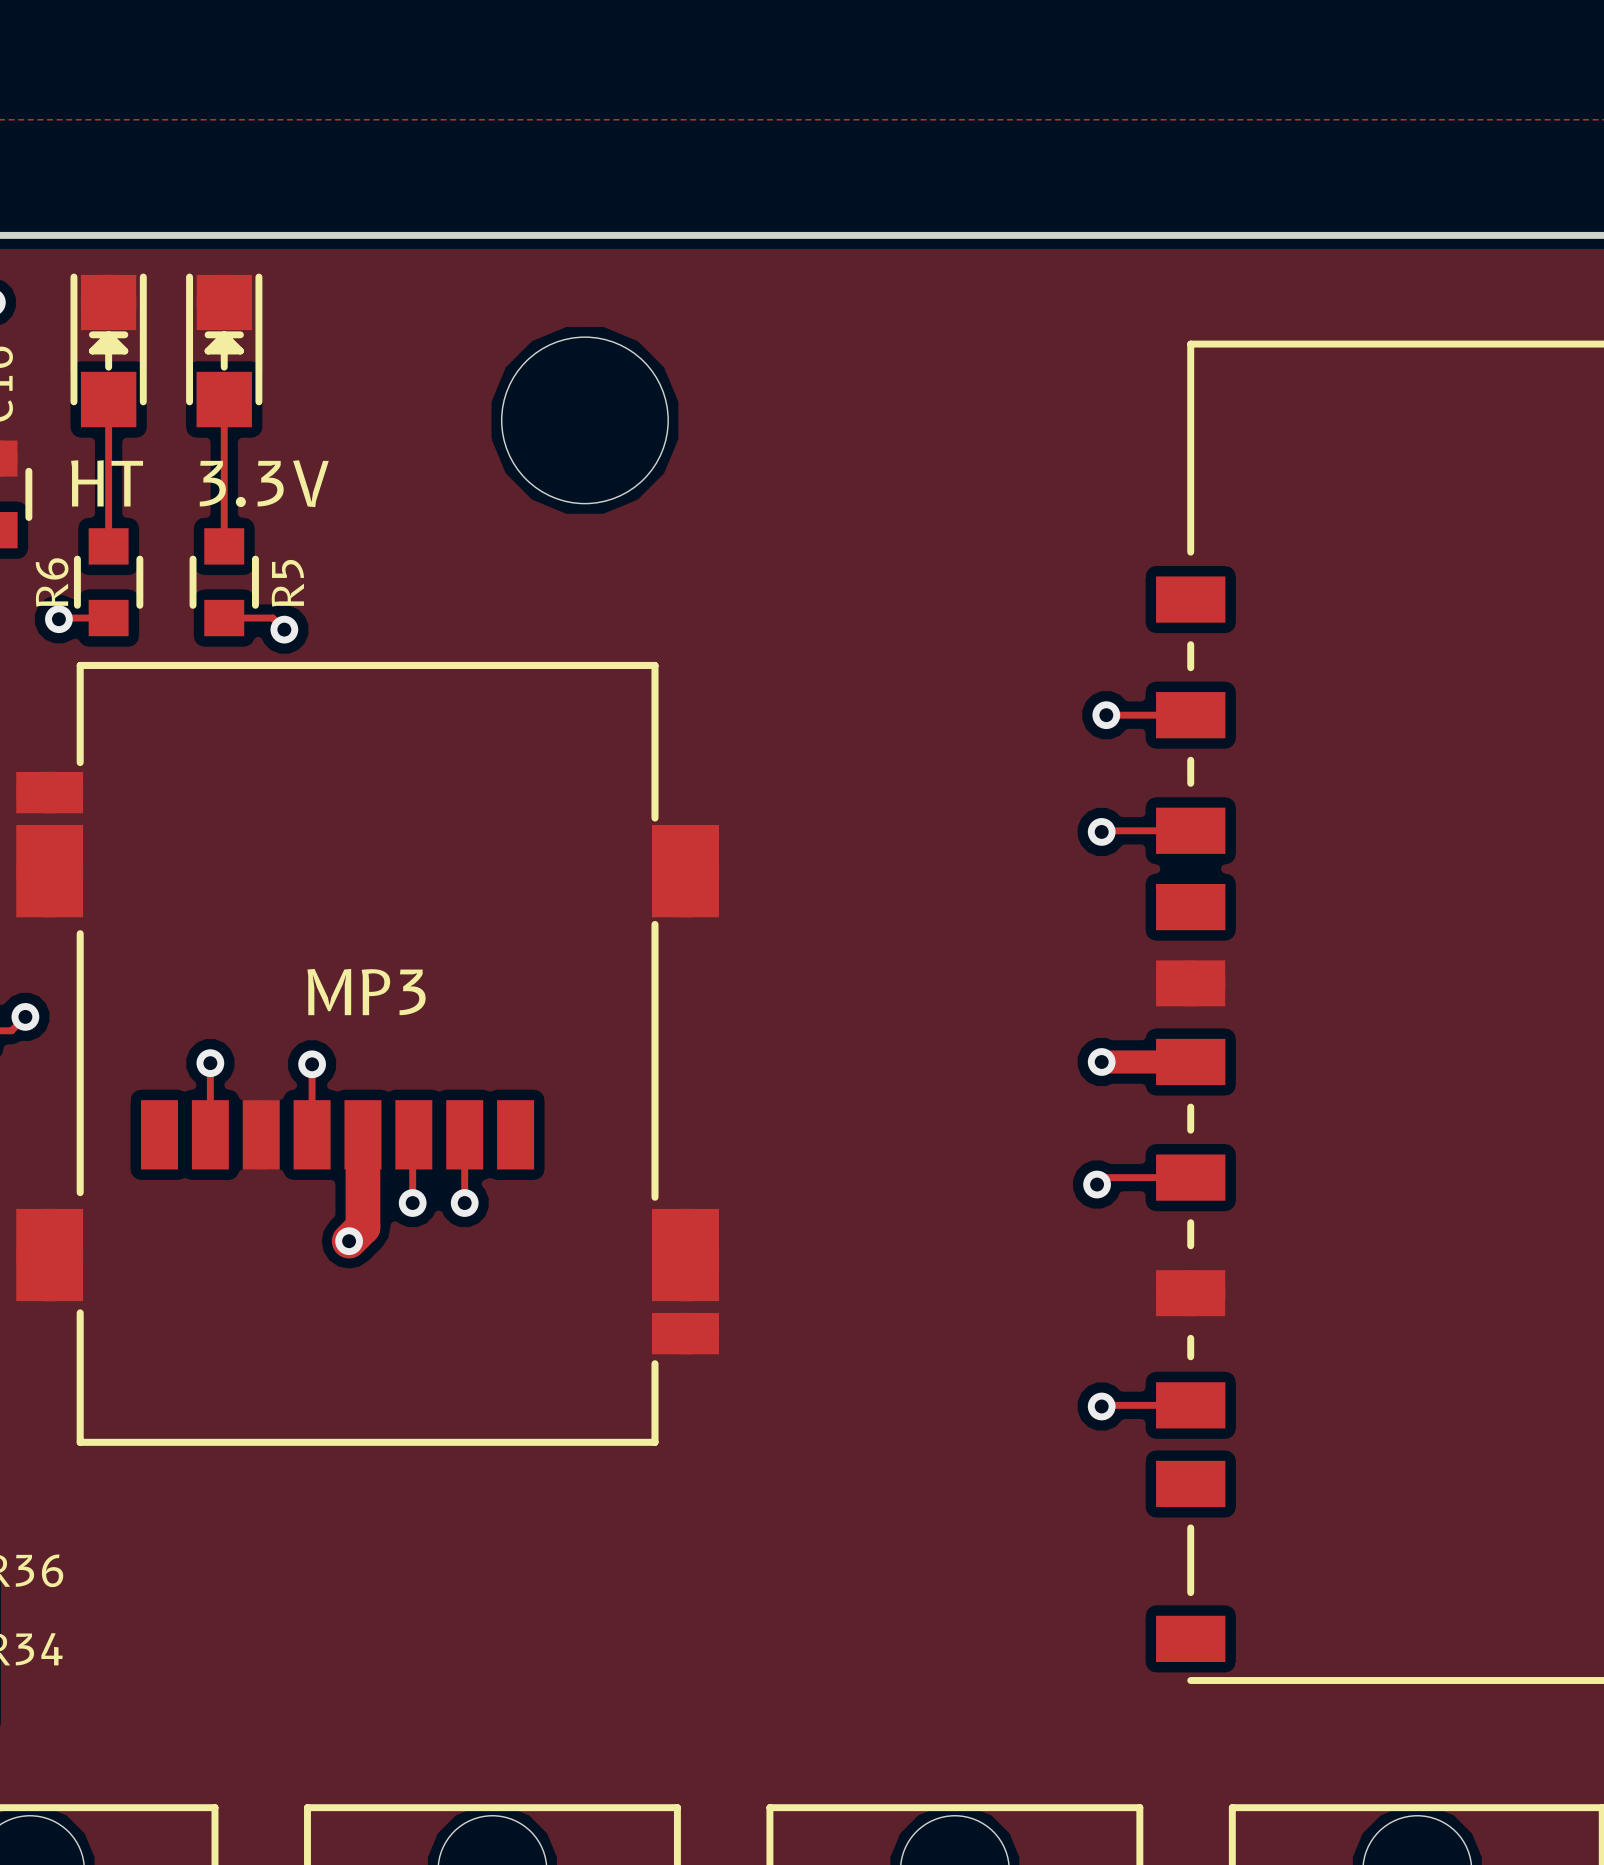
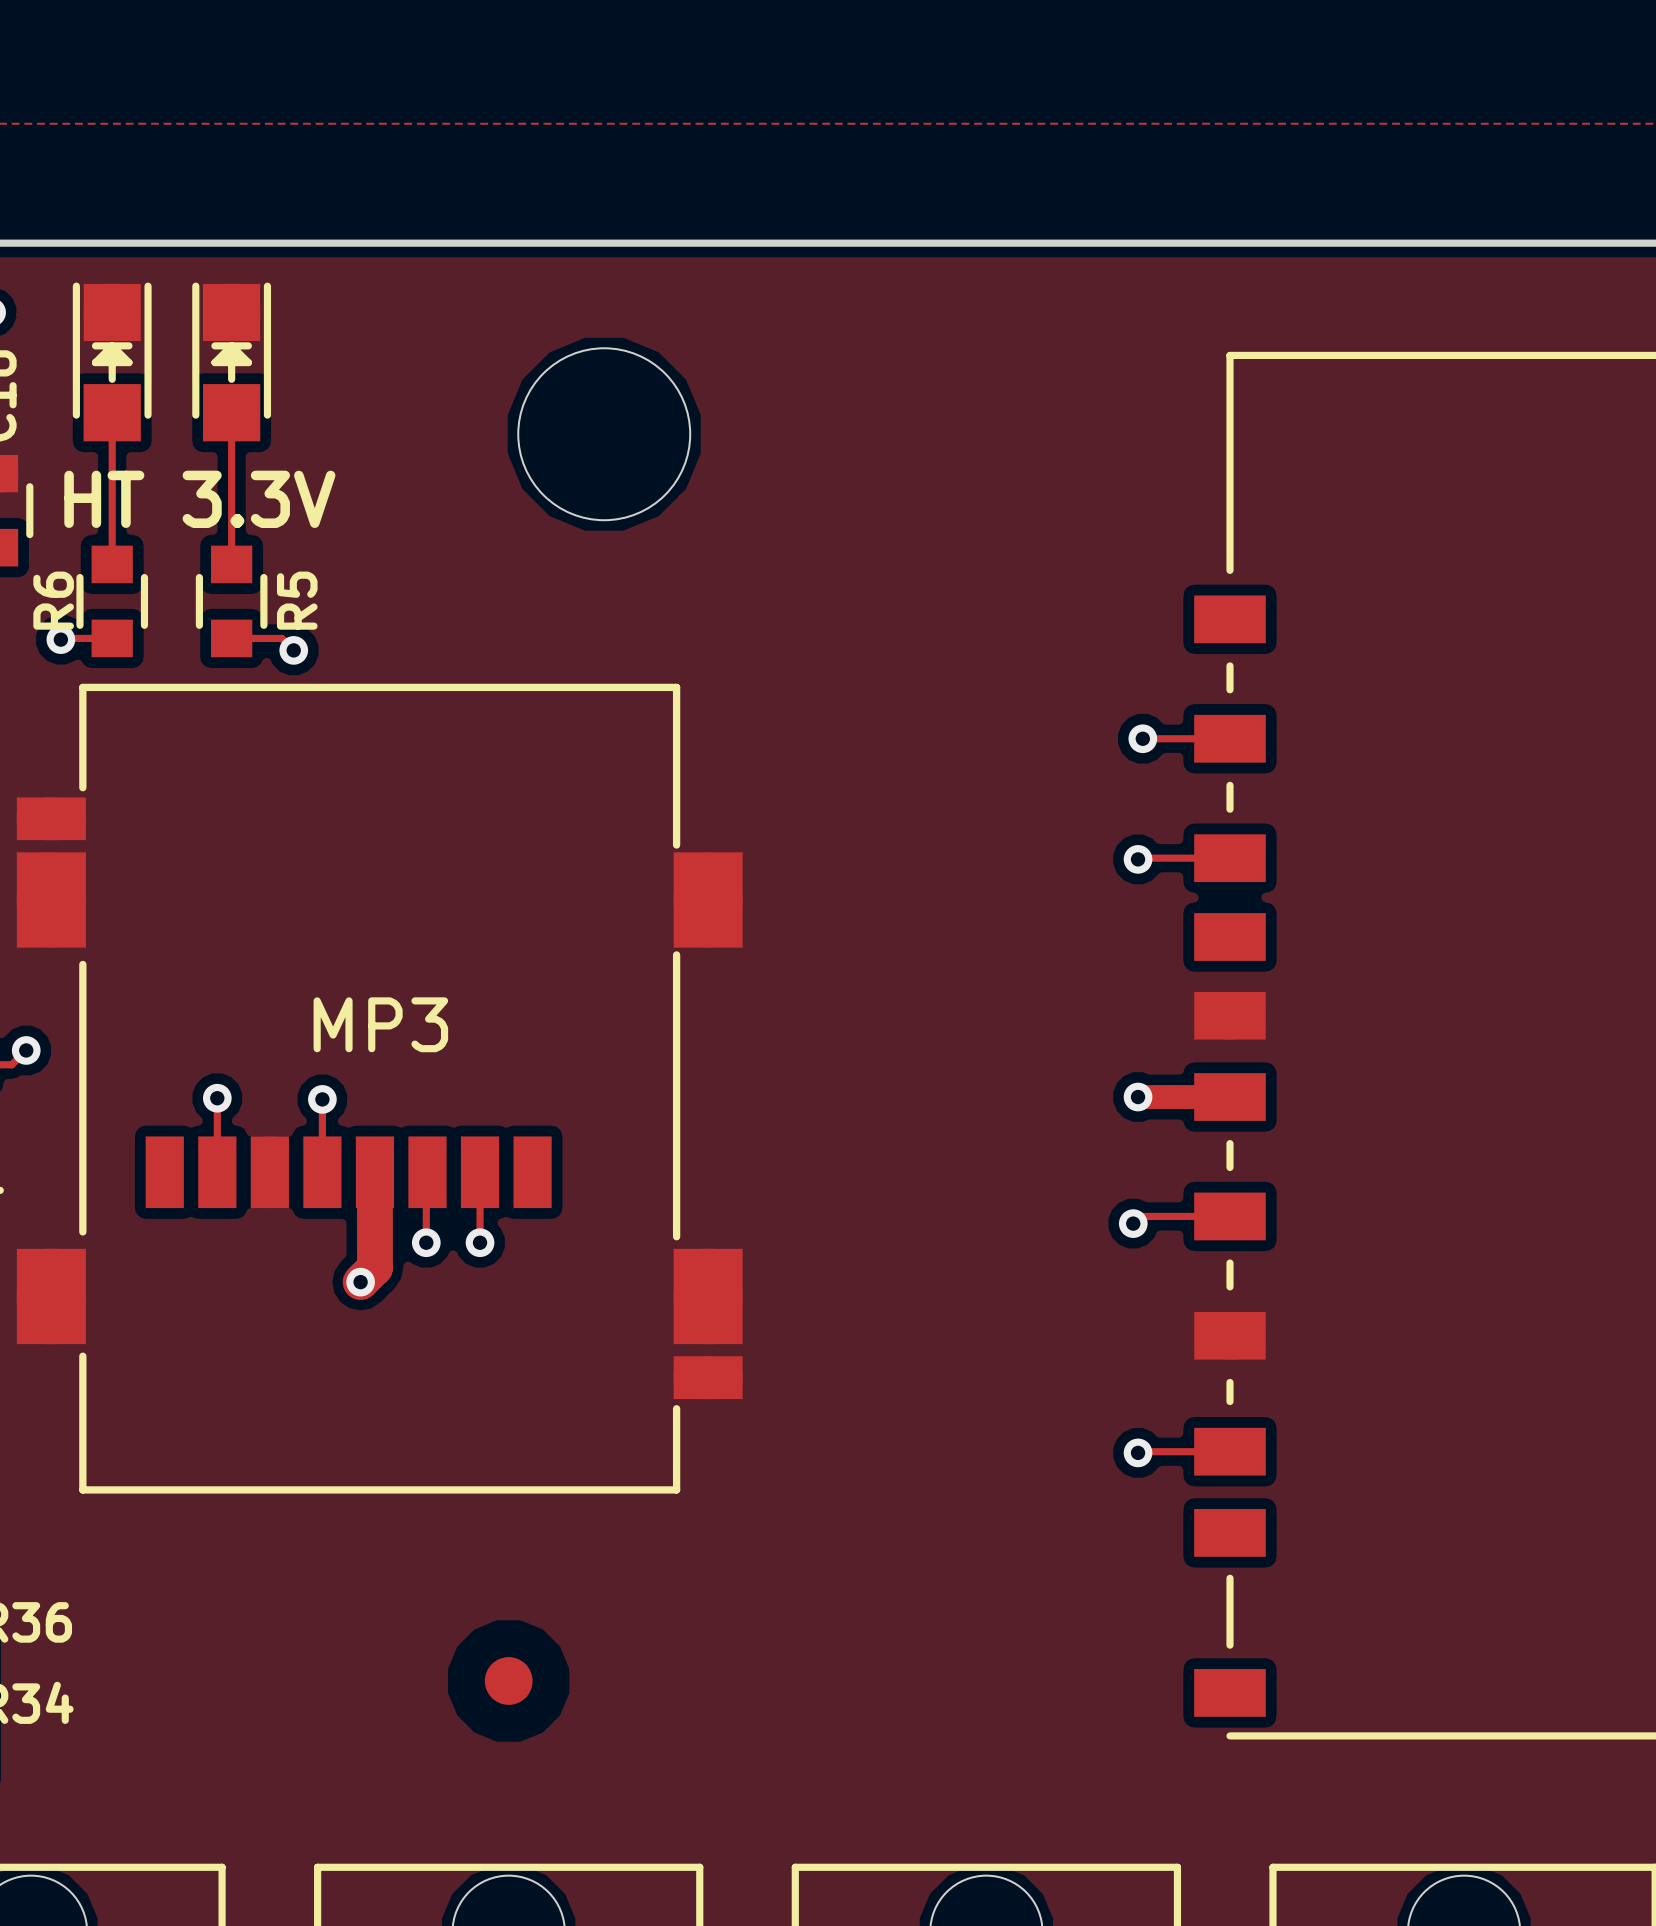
part: none -> (508, 1680)

